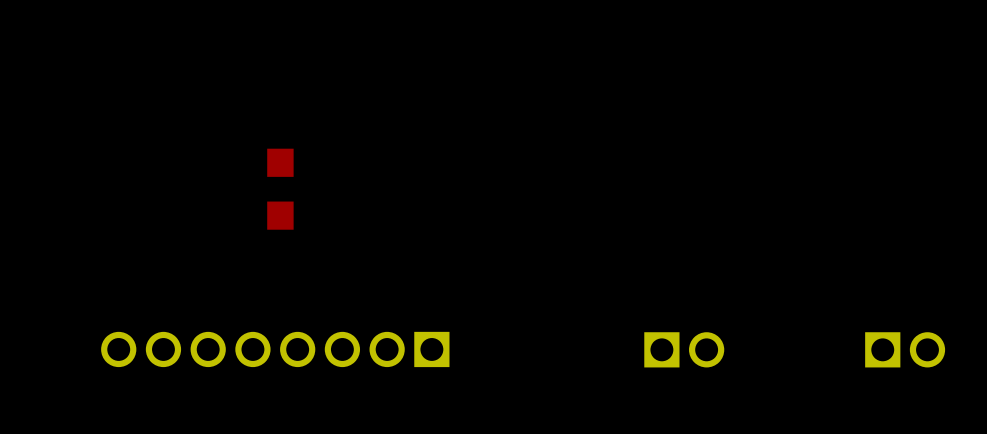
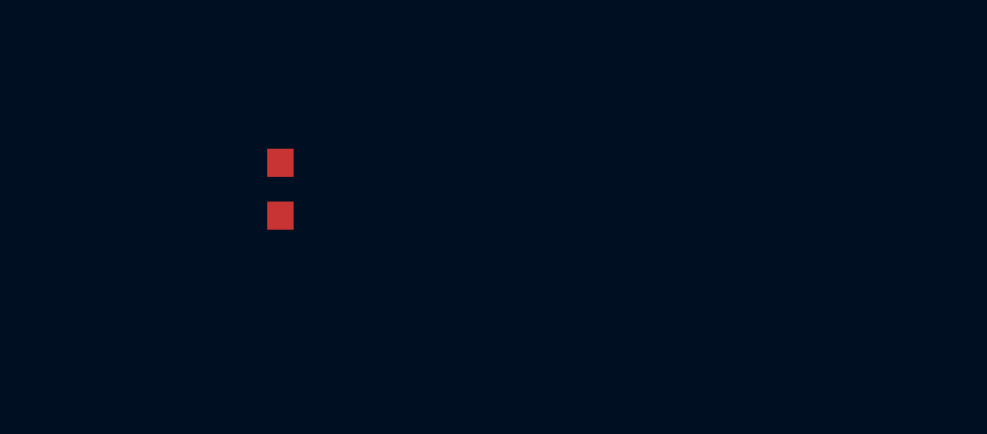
part: (275, 349) -> none
part: (684, 349) -> none
part: (905, 349) -> none

